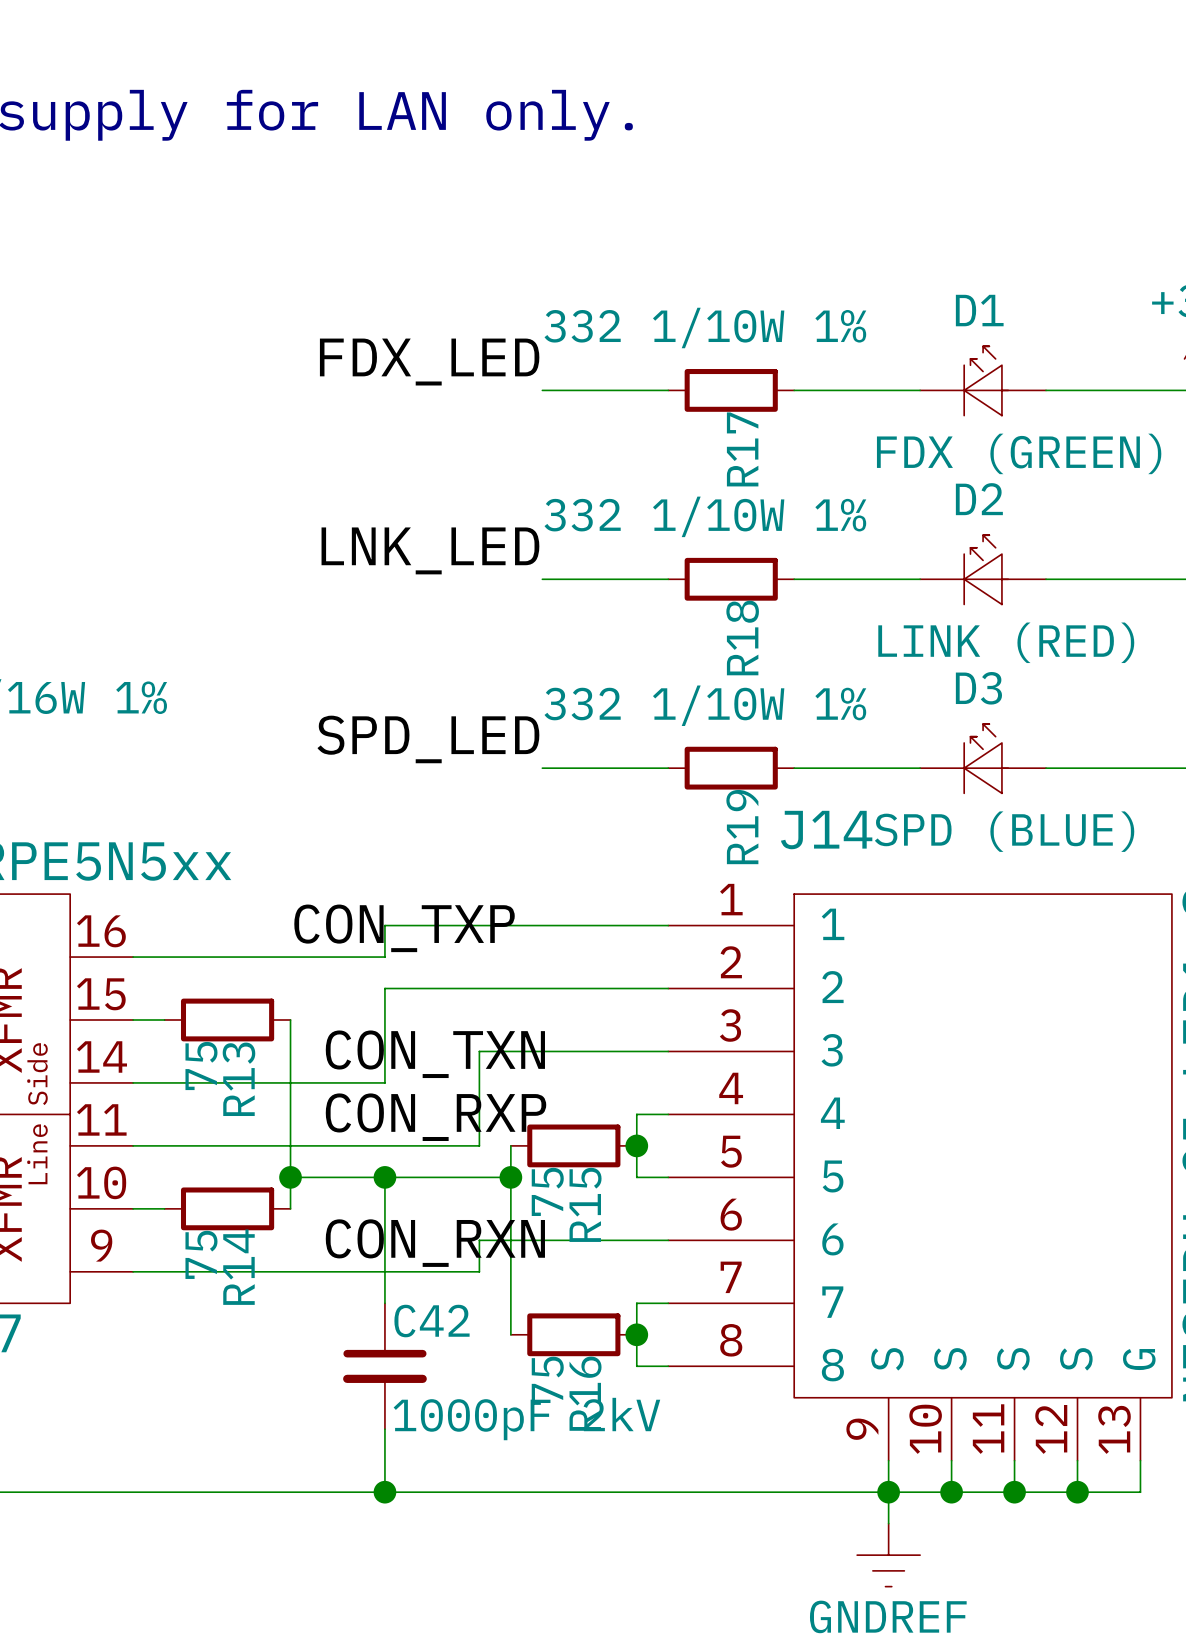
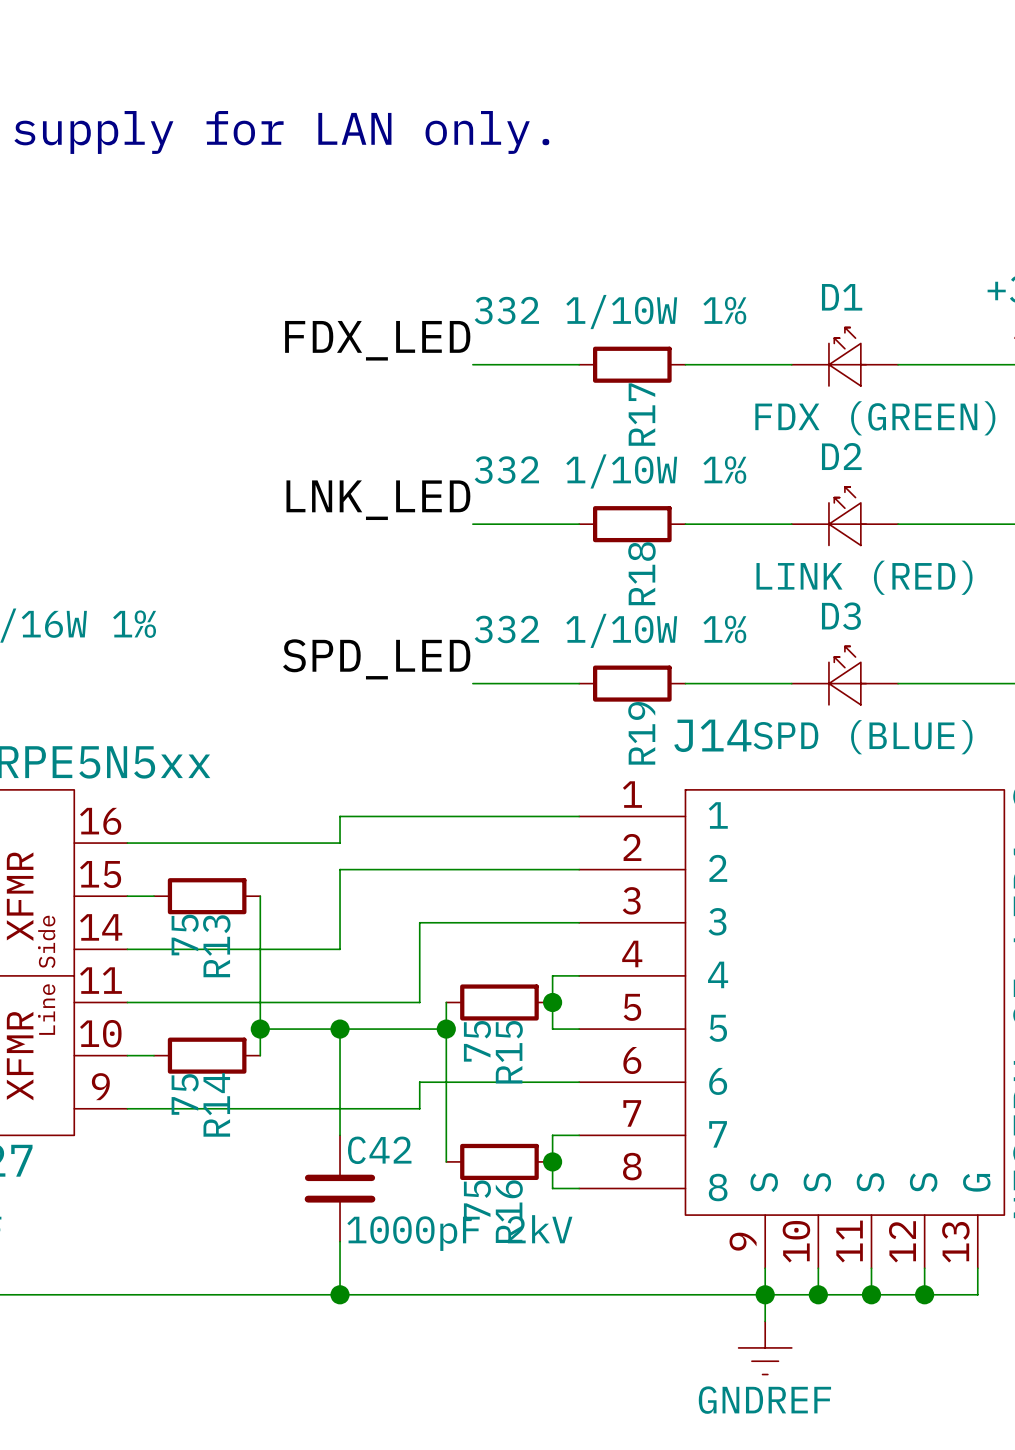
label: CON_TXP (404, 928) -> none
label: CON_TXN (435, 1054) -> none
label: CON_RXP (436, 1117) -> none
label: CON_RXN (435, 1243) -> none

